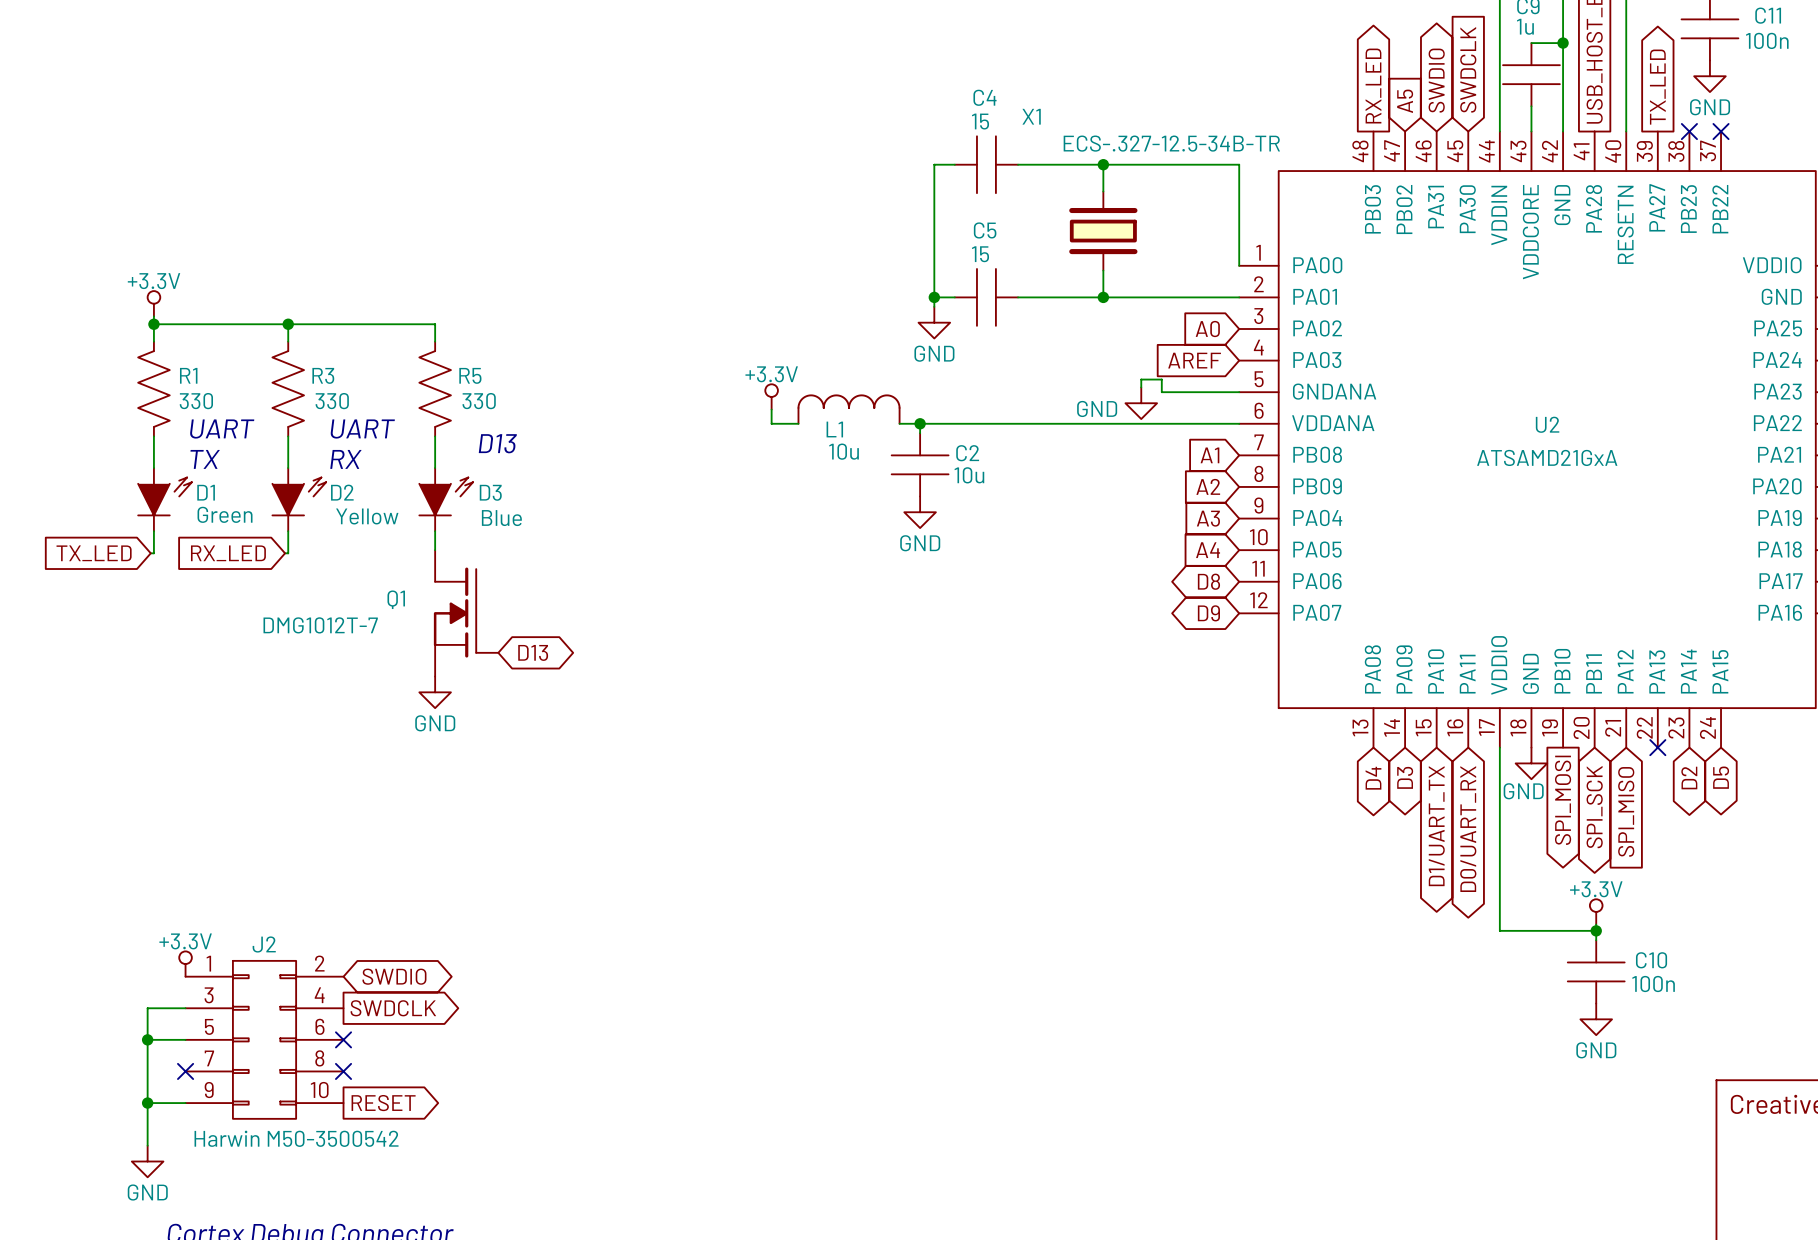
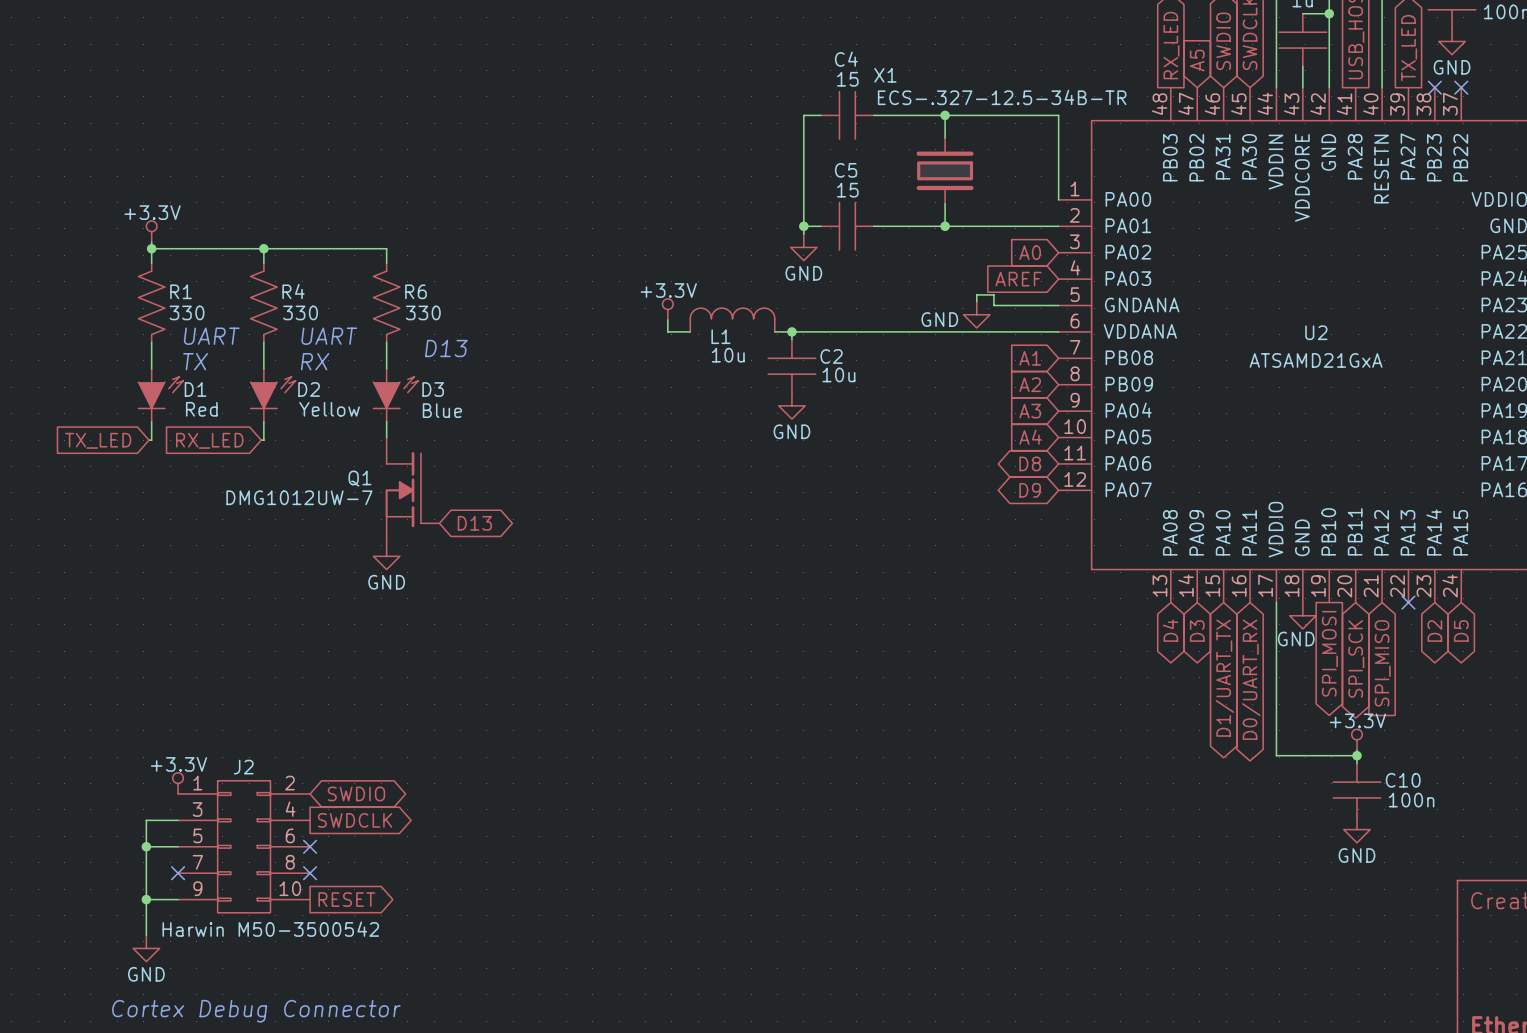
R3 name: R3 (323, 375) -> R4 (293, 291)
R5 name: R5 (470, 375) -> R6 (416, 291)
D1 value: Green (225, 514) -> Red (201, 409)
Q1 value: DMG1012T-7 (320, 625) -> DMG1012UW-7 (299, 497)

